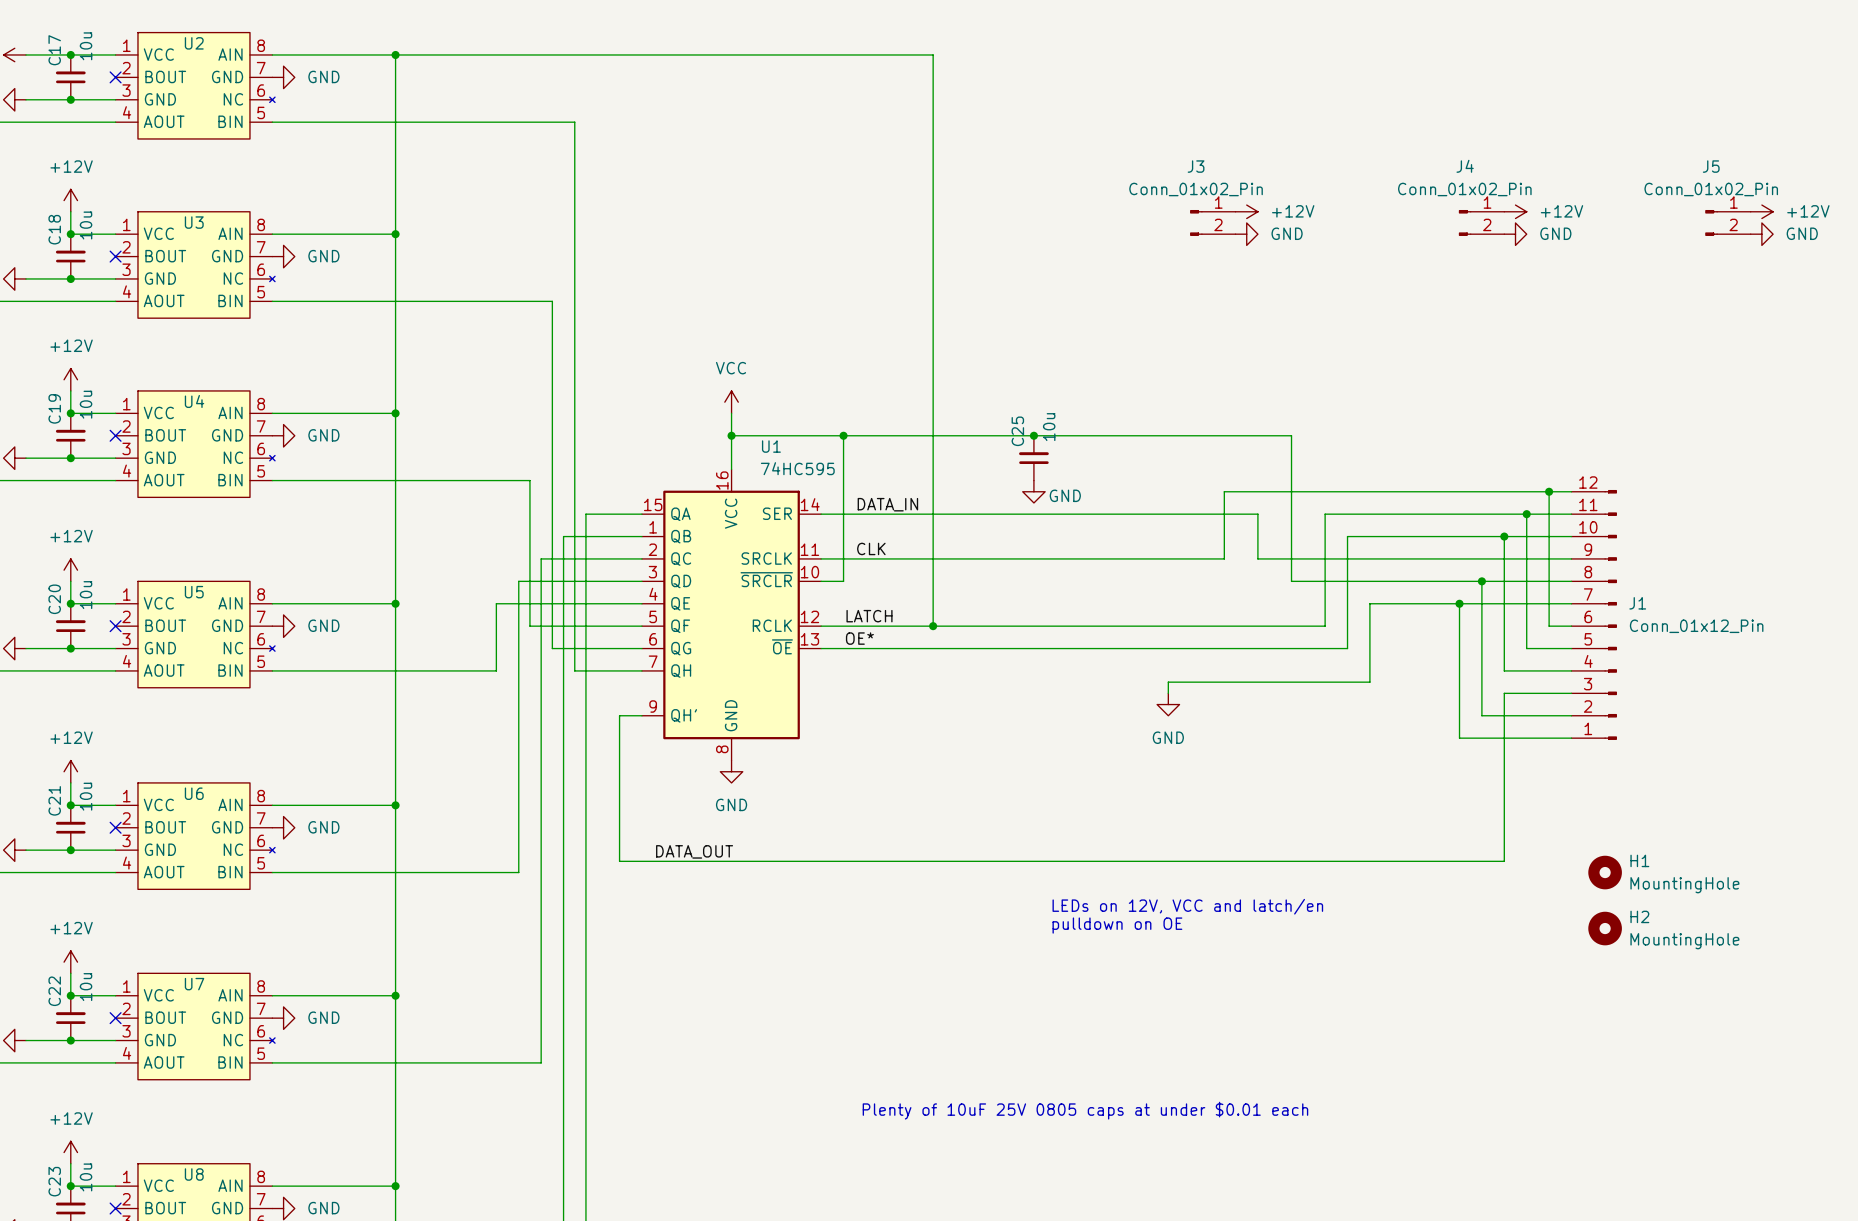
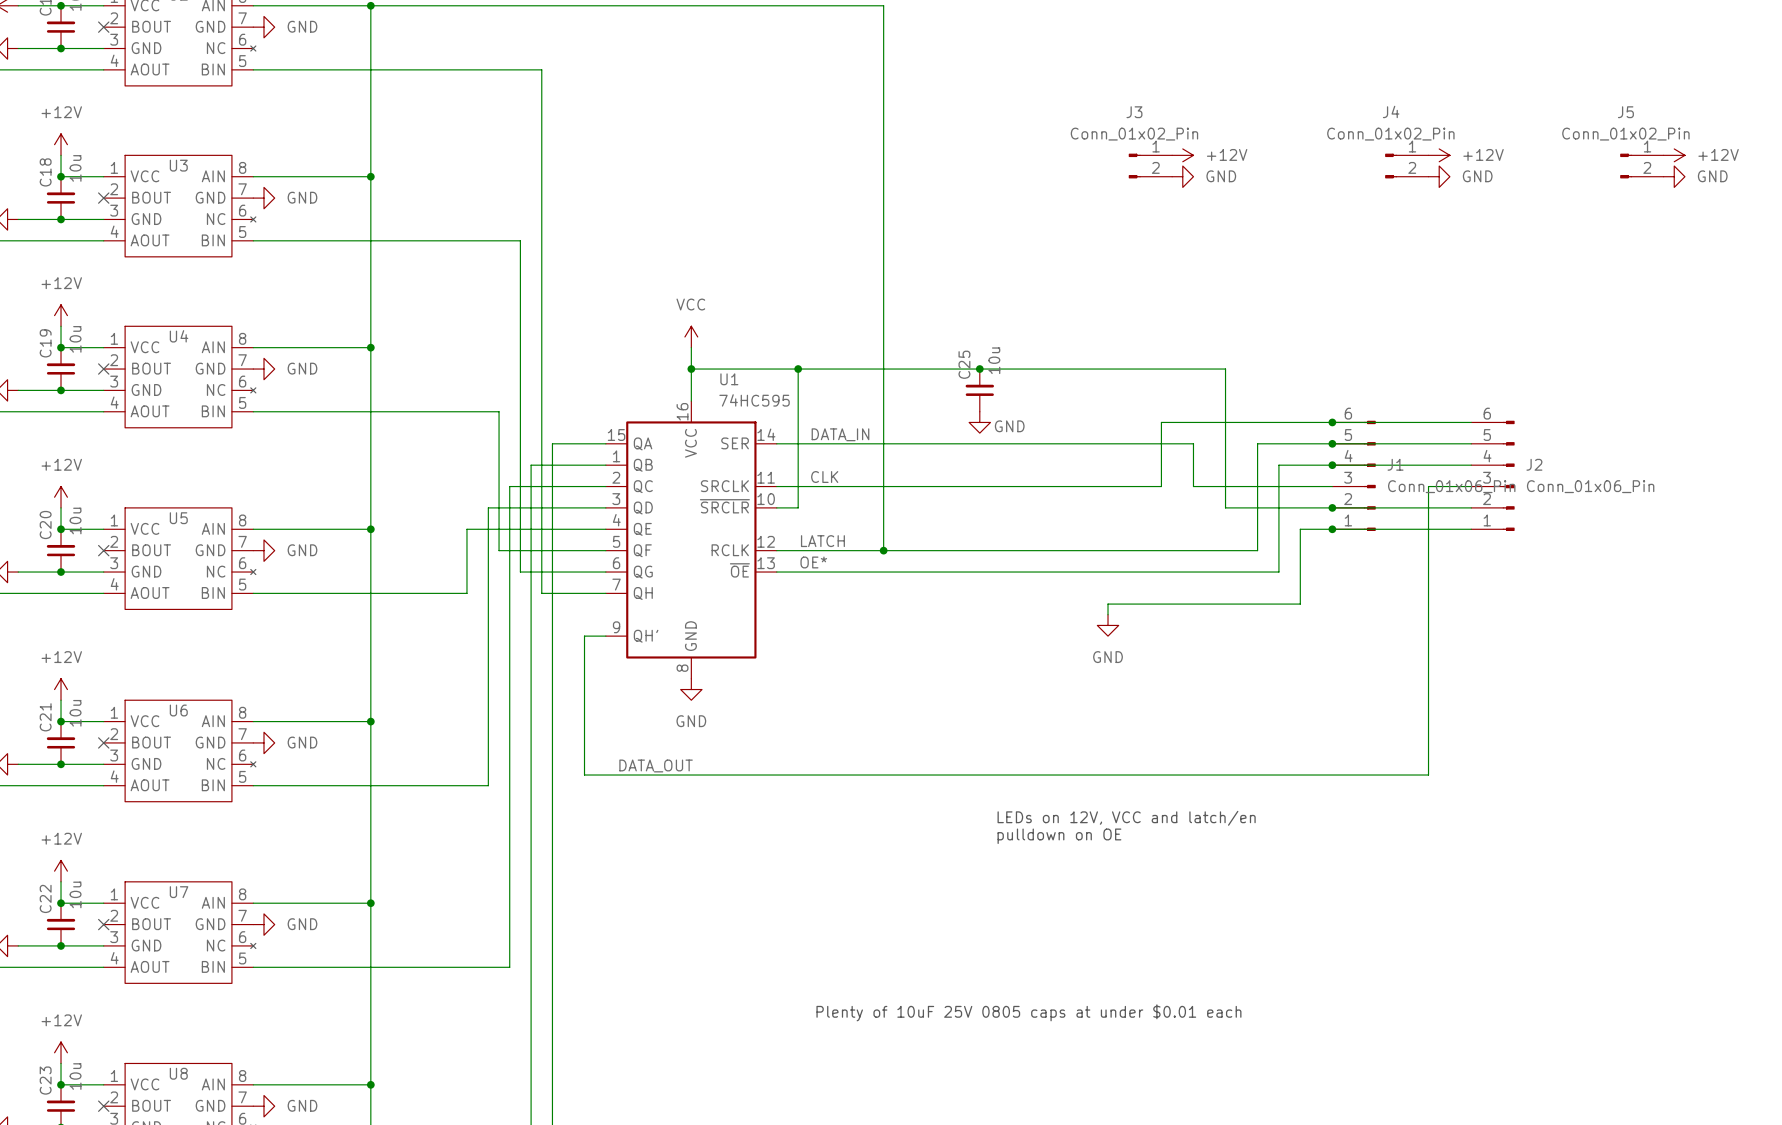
J1 symbol: [1571, 489, 1617, 740] -> [1332, 420, 1376, 531]
junction: none -> (1332, 422)
junction: (1549, 491) -> none
wire: (1571, 491) (1549, 491) (1549, 626) (1571, 626) -> none
junction: none -> (1332, 443)
wire: (1526, 514) (1526, 648) (1571, 648) -> none
junction: (1526, 514) -> none
junction: none -> (1332, 465)
wire: (1504, 536) (1504, 558) (1403, 558) -> none
junction: (1504, 536) -> none
J2: none -> Conn_01x06_Pin (1492, 475)
junction: none -> (1332, 507)
wire: (1481, 581) (1481, 715) (1571, 715) -> none
junction: (1481, 581) -> none
junction: none -> (1332, 529)
wire: (1459, 603) (1459, 738) (1571, 738) -> none
junction: (1459, 603) -> none
J1 value: Conn_01x12_Pin (1696, 626) -> Conn_01x06_Pin (1451, 486)
wire: (1504, 670) (1571, 670) -> (1428, 593) (1428, 614)
wire: (1504, 693) (1571, 693) -> none
H1: MountingHole (1605, 872) -> none
H2: MountingHole (1605, 928) -> none

